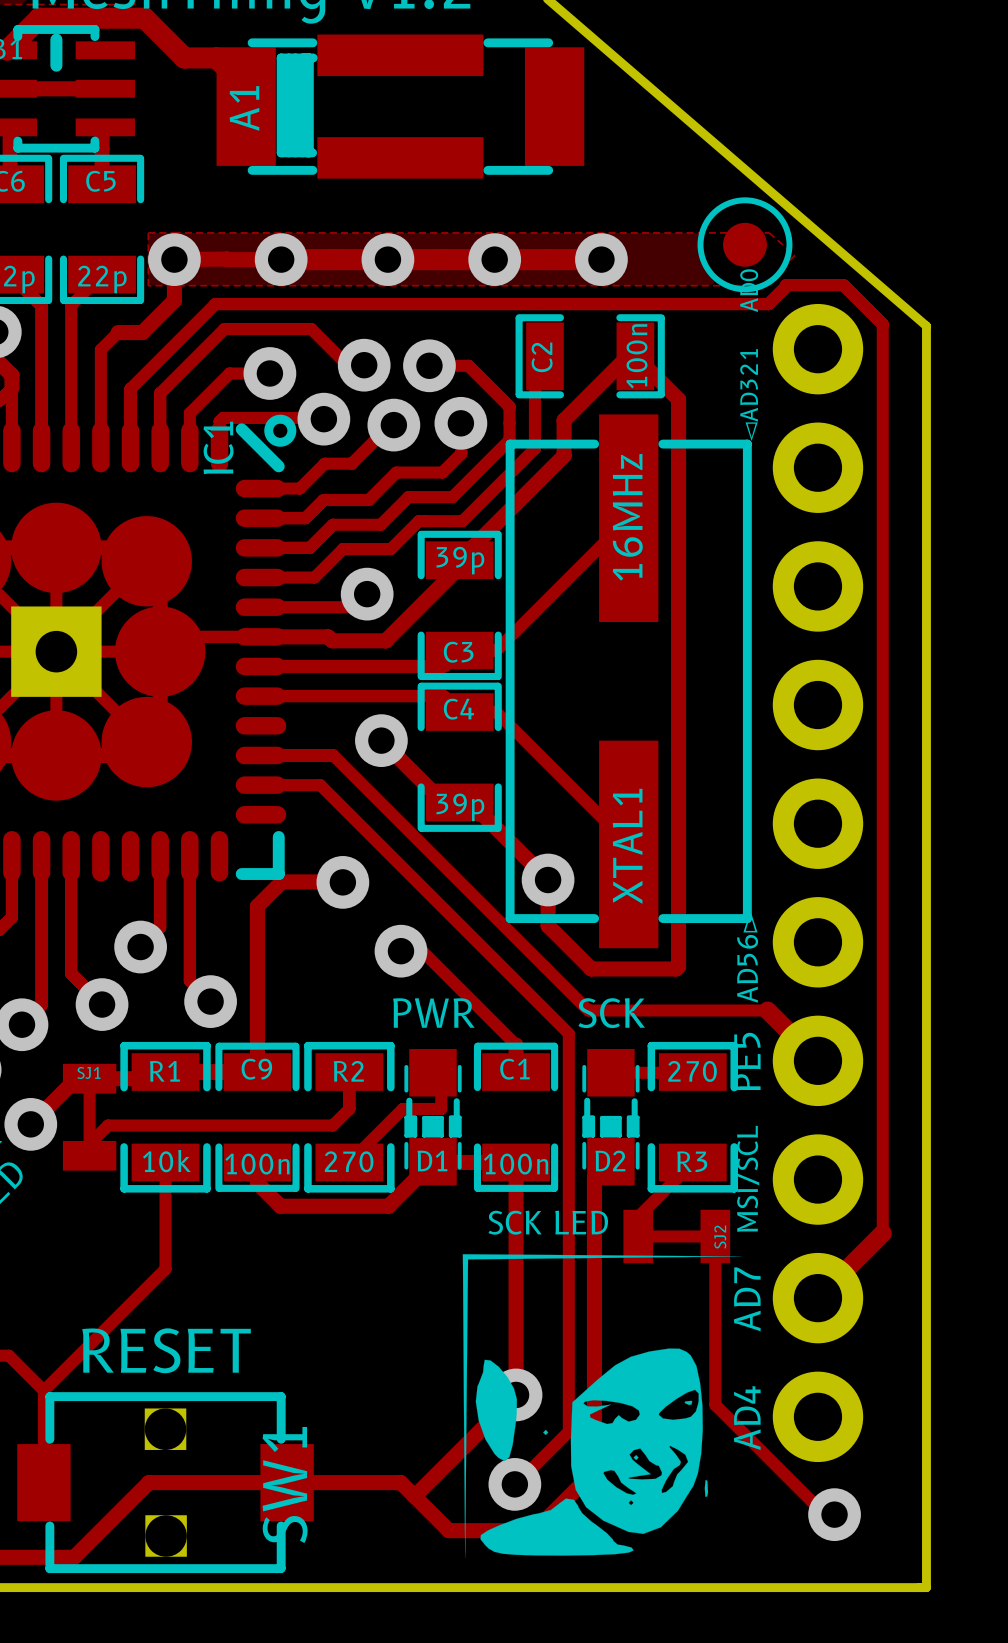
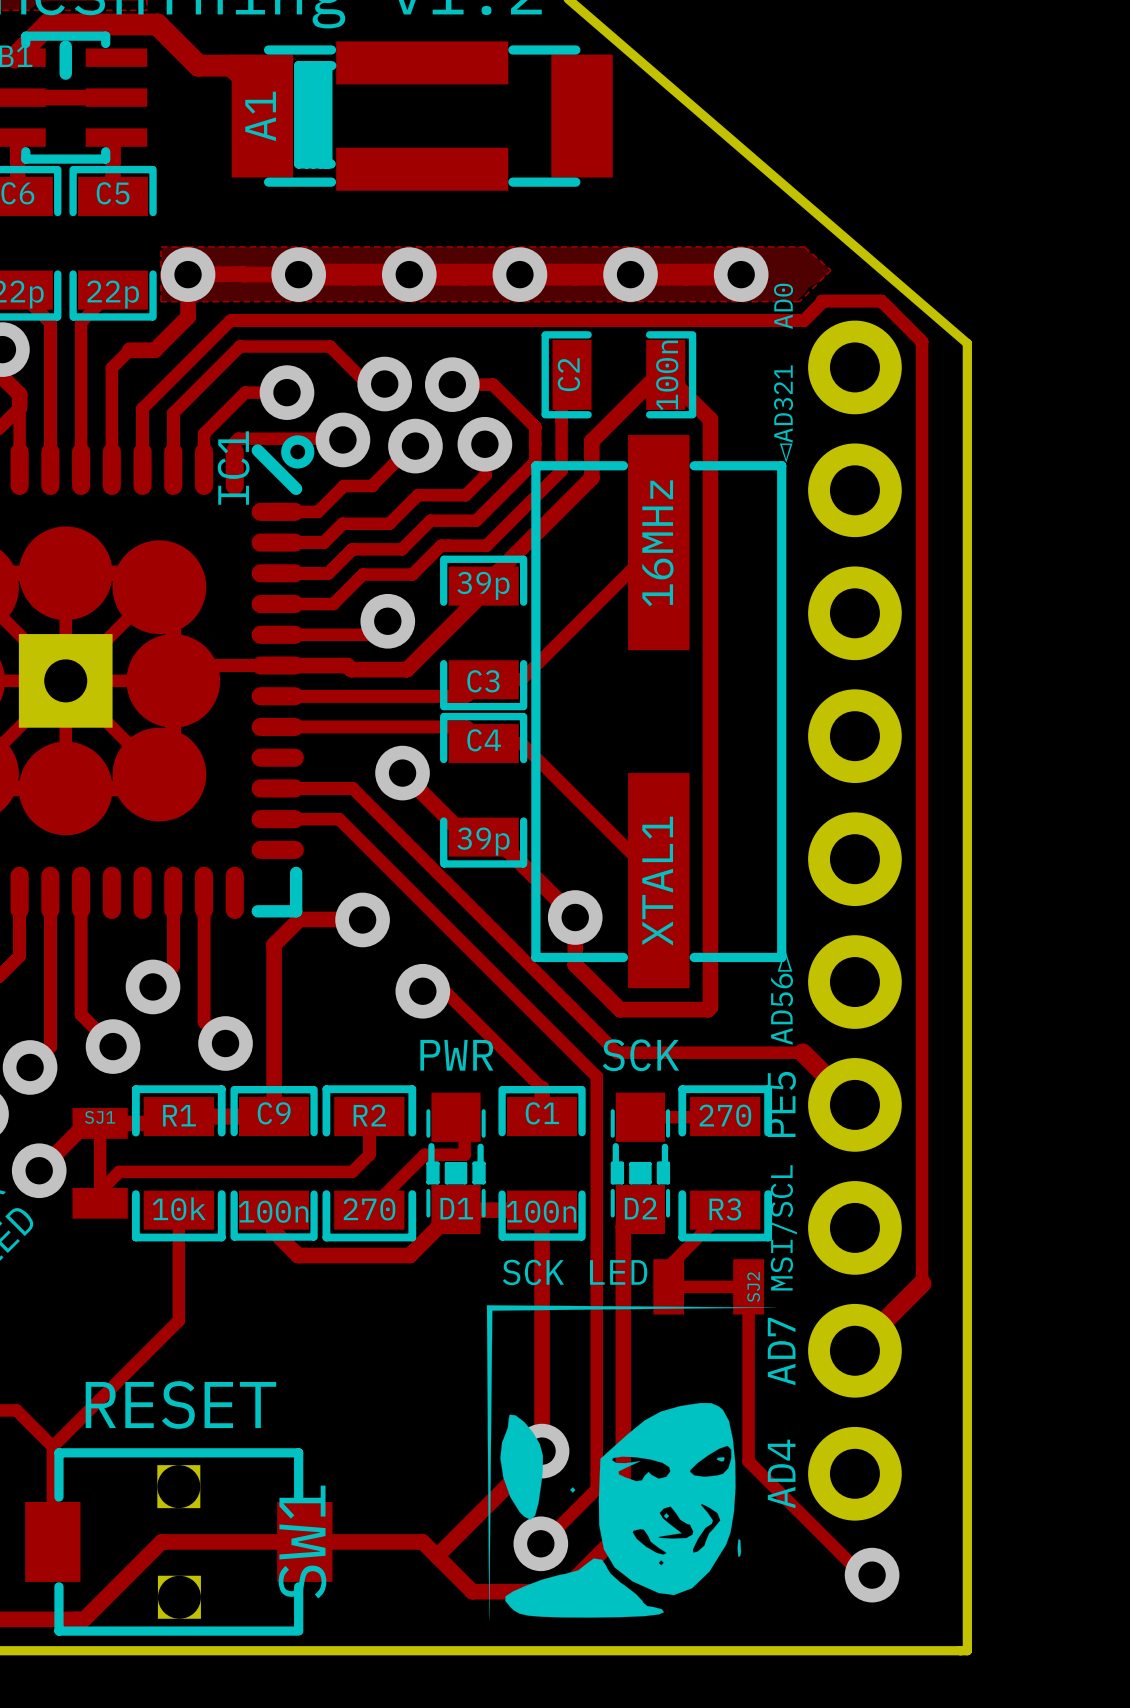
part: (744, 244) -> none
track: none -> (630, 274) (741, 274)
via: none -> (741, 274)

